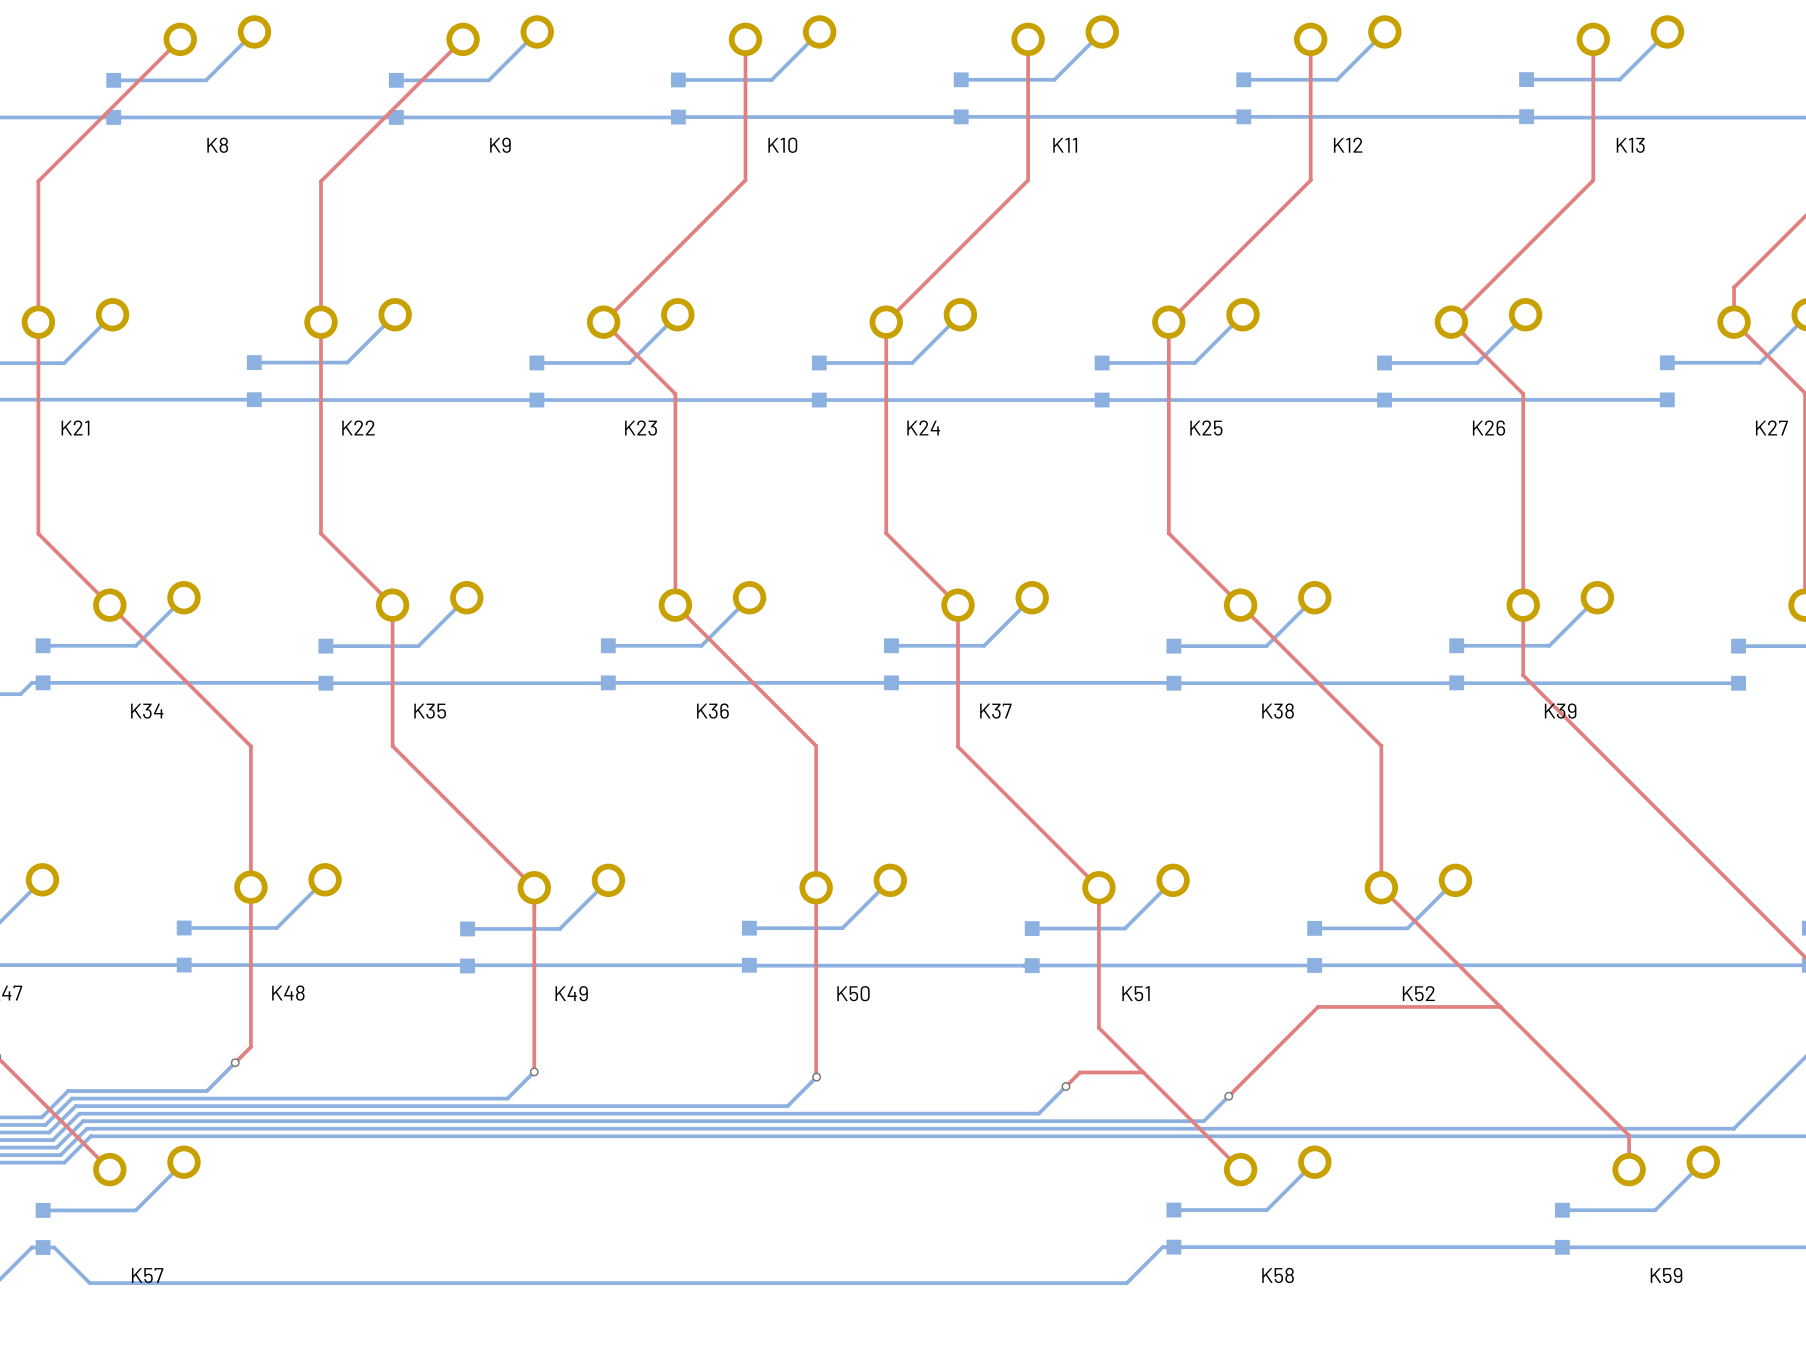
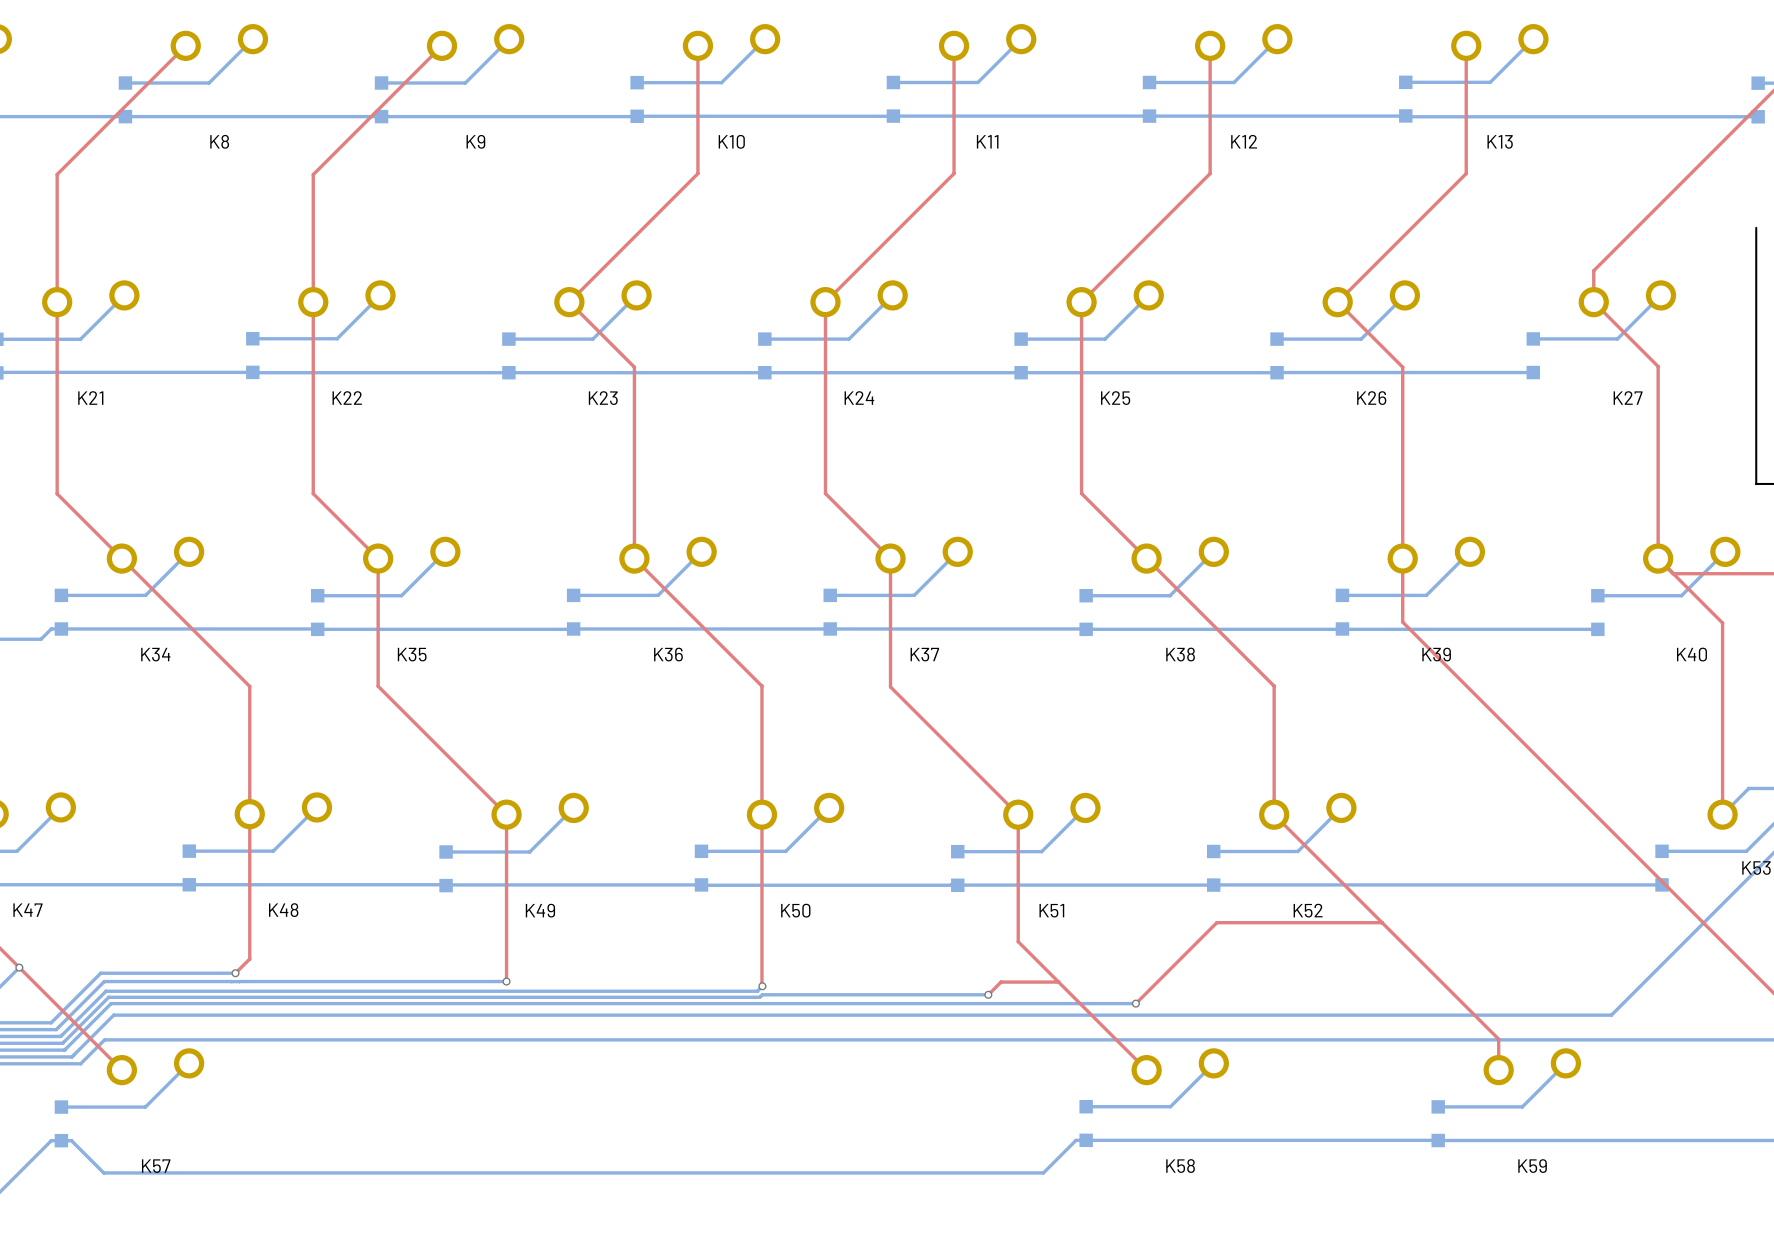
bottom track: (235, 1062) (206, 1091) (68, 1091) (41, 1117) (31, 1117) -> (235, 973) (100, 973) (51, 1022)
bottom track: (534, 1071) (507, 1098) (71, 1098) (45, 1124) (37, 1124) -> (506, 981) (104, 981) (56, 1029)
bottom track: (811, 1082) (787, 1106) (75, 1106) (49, 1132) (42, 1132) -> (757, 991) (105, 991) (60, 1036)
bottom track: (1065, 1086) (1038, 1113) (79, 1113) (53, 1140) (44, 1140) -> (988, 994) (762, 994) (759, 997) (108, 997) (62, 1043)
bottom track: (1228, 1096) (1203, 1121) (83, 1121) (56, 1147) (46, 1147) -> (1135, 1003) (111, 1003) (64, 1050)
bottom track: (1753, 1108) (1733, 1128) (86, 1128) (60, 1155) (54, 1155) -> (1611, 1015) (113, 1015) (71, 1056)

